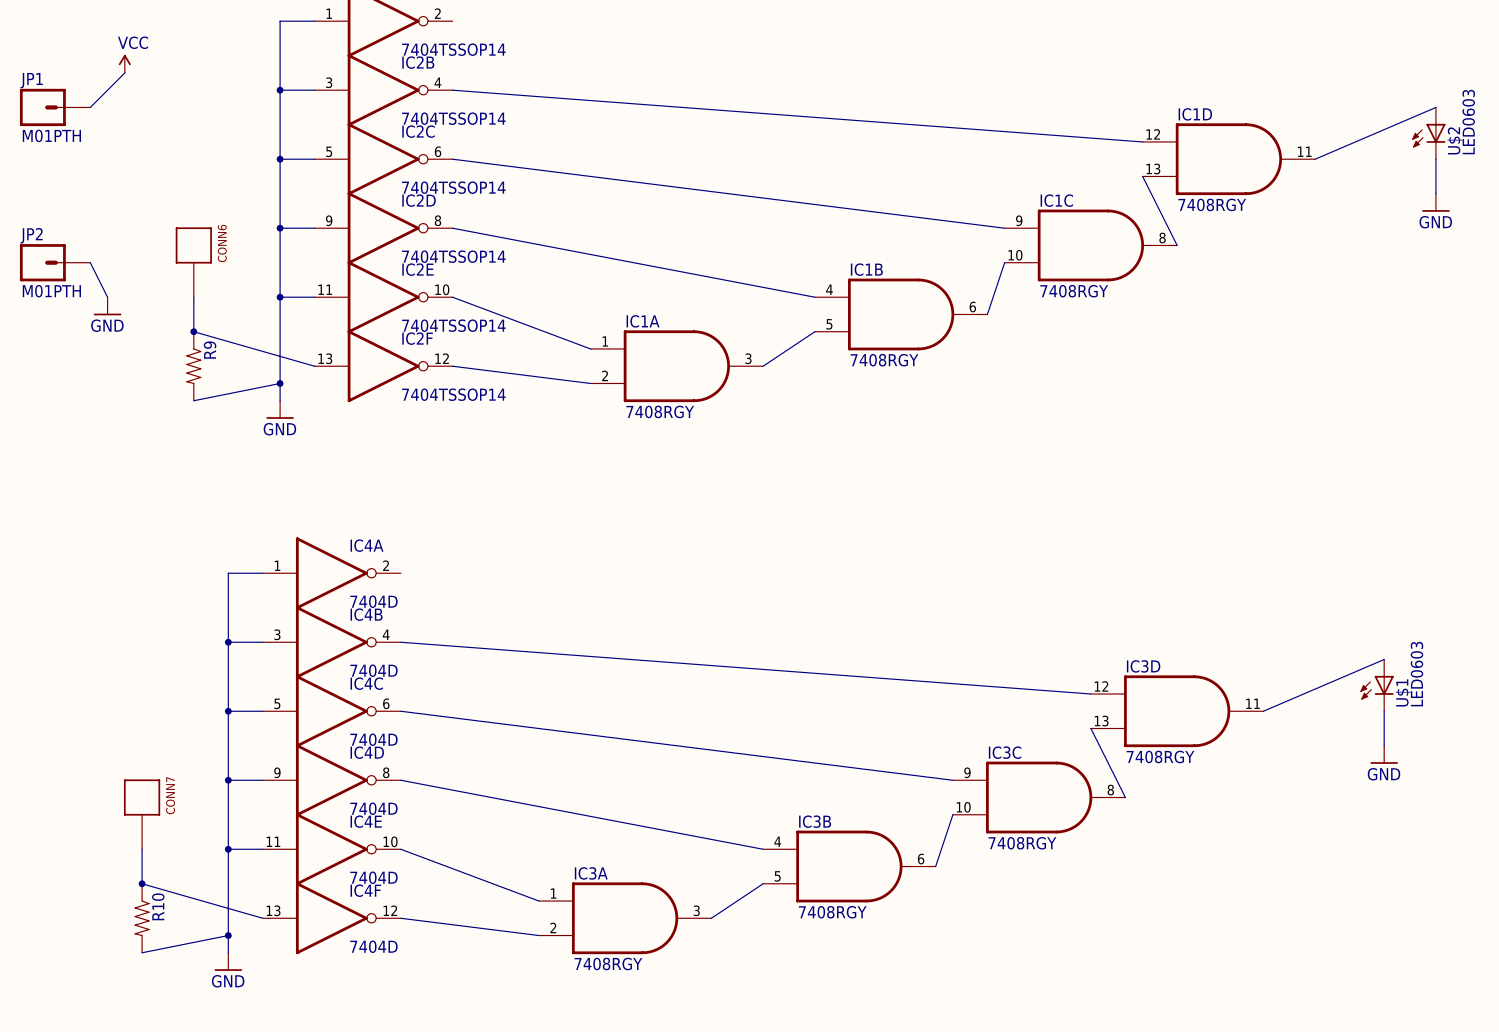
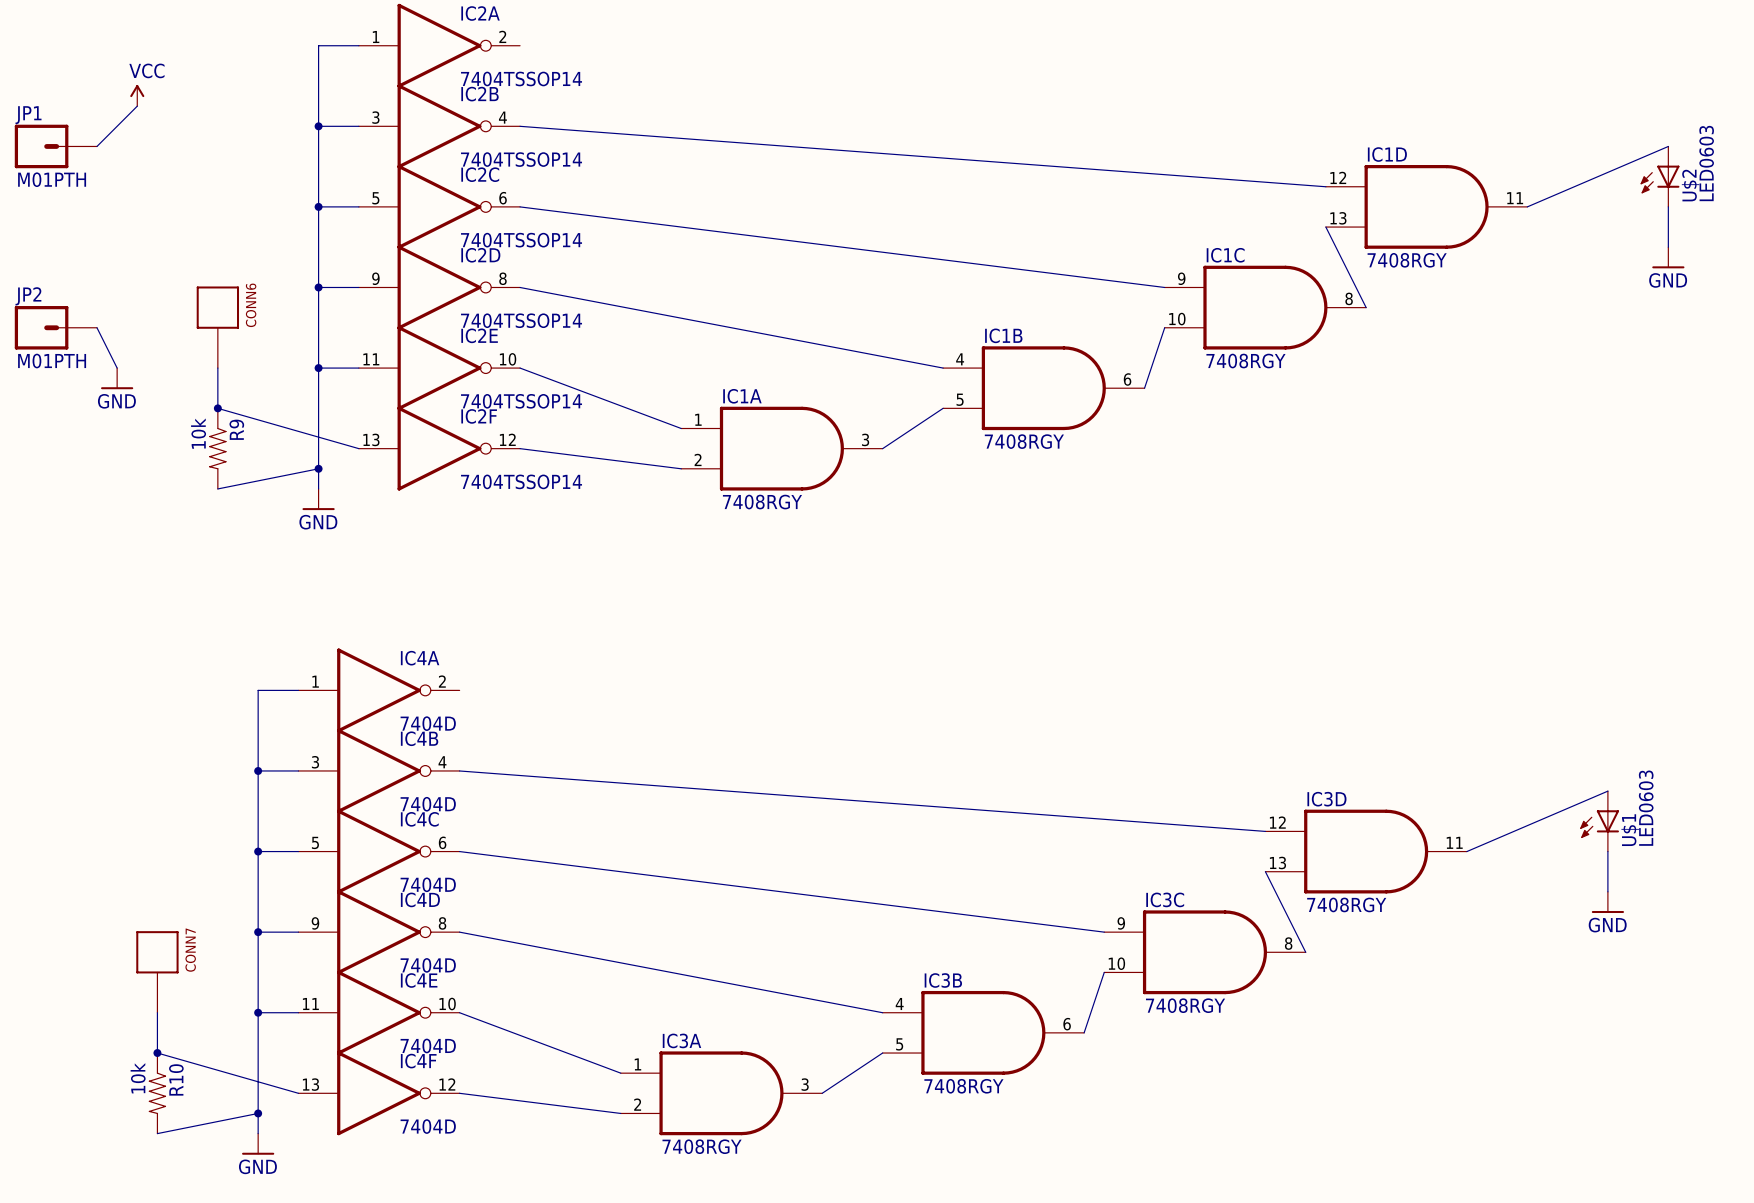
R9 value: none -> 10k (198, 433)
R10 value: none -> 10k (138, 1078)

